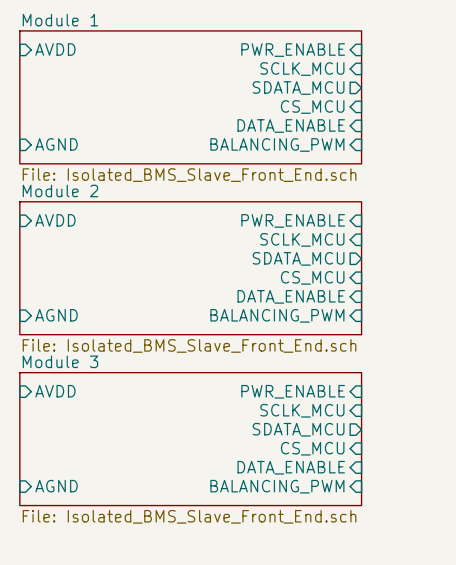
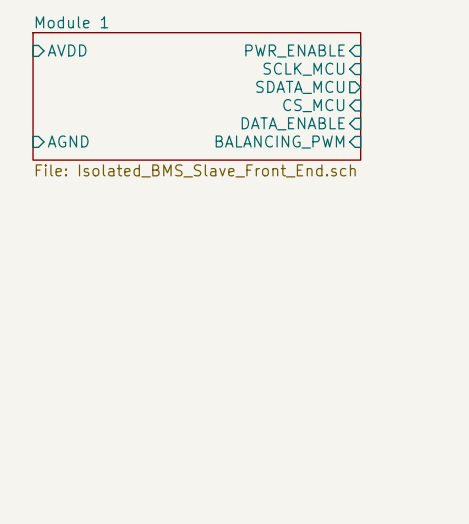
sheet pin: AVDD (55, 220) -> none
sheet pin: PWR_ENABLE (293, 220) -> none
sheet pin: SCLK_MCU (302, 239) -> none
sheet pin: SDATA_MCU (298, 258) -> none
sheet Module 2: File: Isolated_BMS_Slave_Front_End.sch (190, 268) -> none
sheet pin: CS_MCU (312, 277) -> none
sheet pin: DATA_ENABLE (291, 296) -> none
sheet pin: AGND (56, 315) -> none
sheet pin: BALANCING_PWM (277, 315) -> none
sheet pin: AVDD (55, 391) -> none
sheet pin: PWR_ENABLE (293, 391) -> none
sheet pin: SCLK_MCU (302, 410) -> none
sheet pin: SDATA_MCU (298, 429) -> none
sheet Module 3: File: Isolated_BMS_Slave_Front_End.sch (190, 439) -> none
sheet pin: CS_MCU (312, 448) -> none
sheet pin: DATA_ENABLE (291, 467) -> none
sheet pin: AGND (56, 486) -> none
sheet pin: BALANCING_PWM (277, 486) -> none

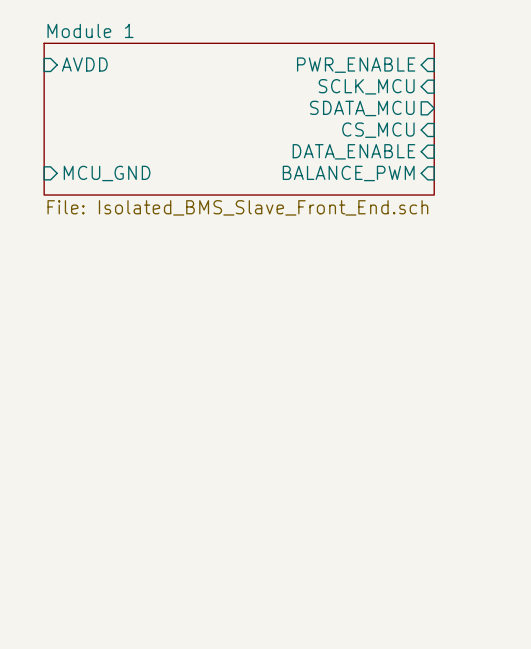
sheet pin: AGND (68, 141) -> MCU_GND (107, 173)
sheet pin: BALANCING_PWM (279, 142) -> BALANCE_PWM (348, 173)

